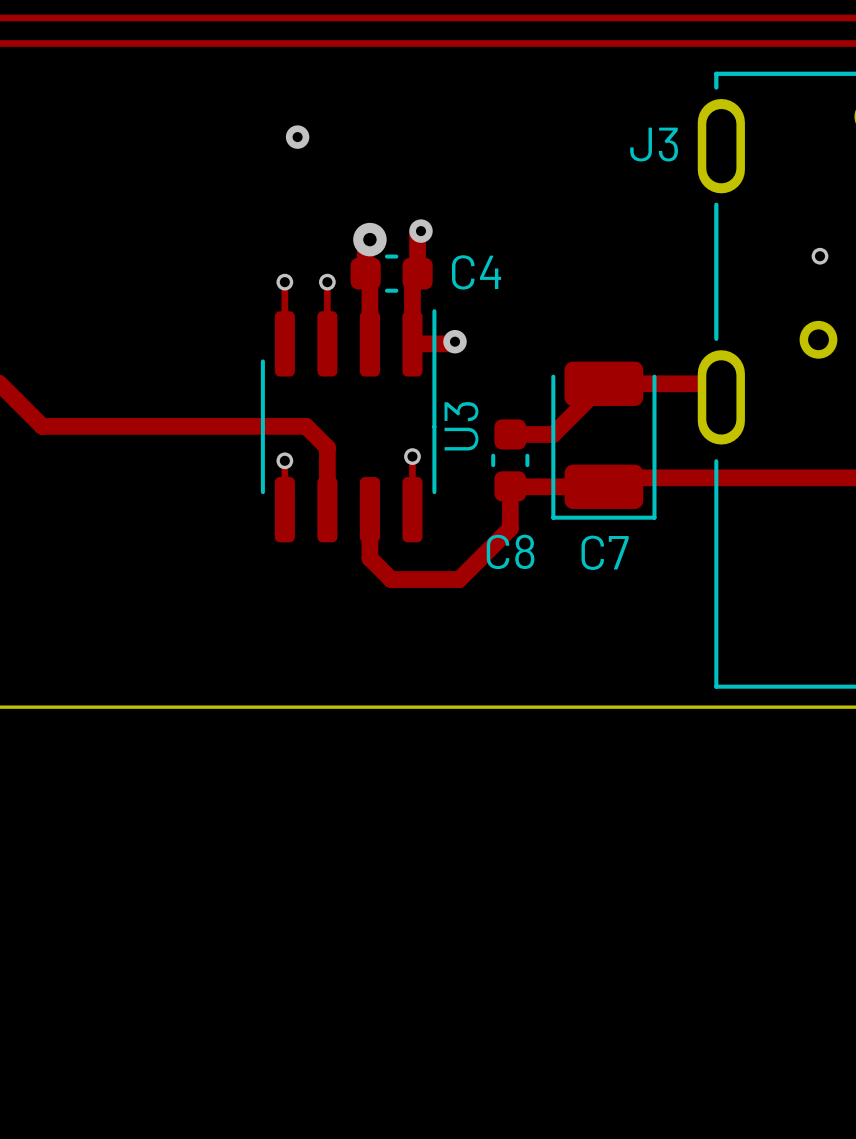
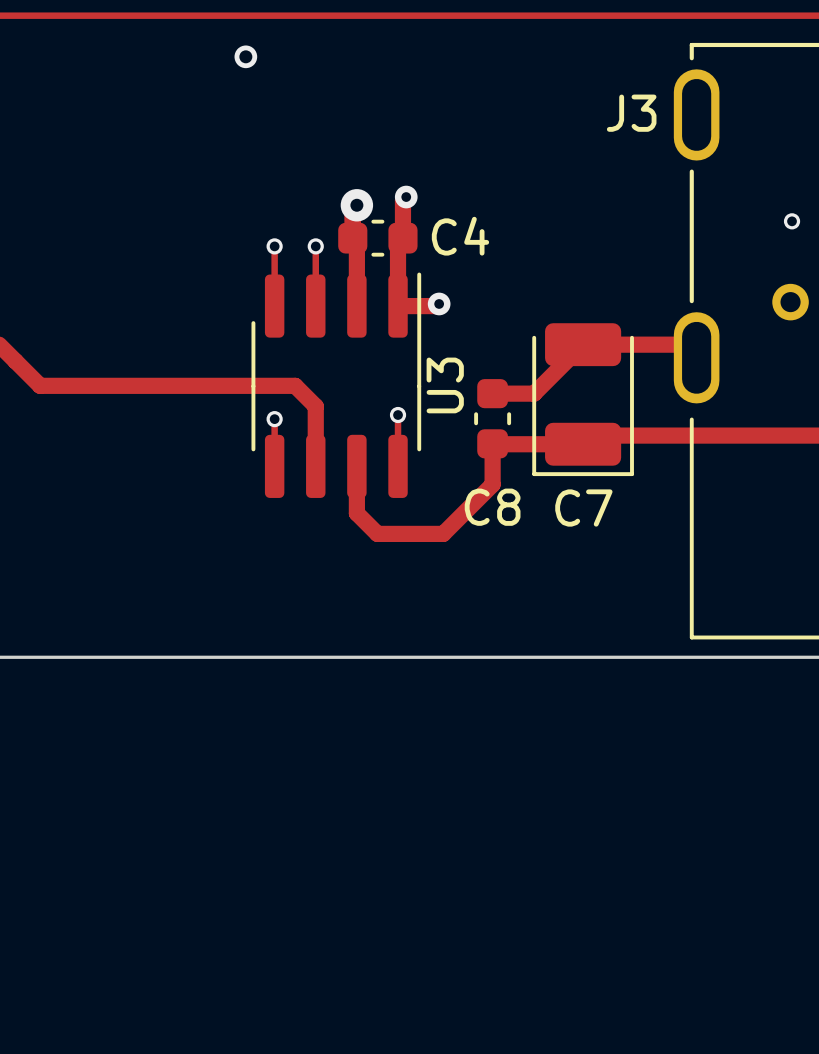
via: none -> (245, 56)
via: (297, 137) -> none

